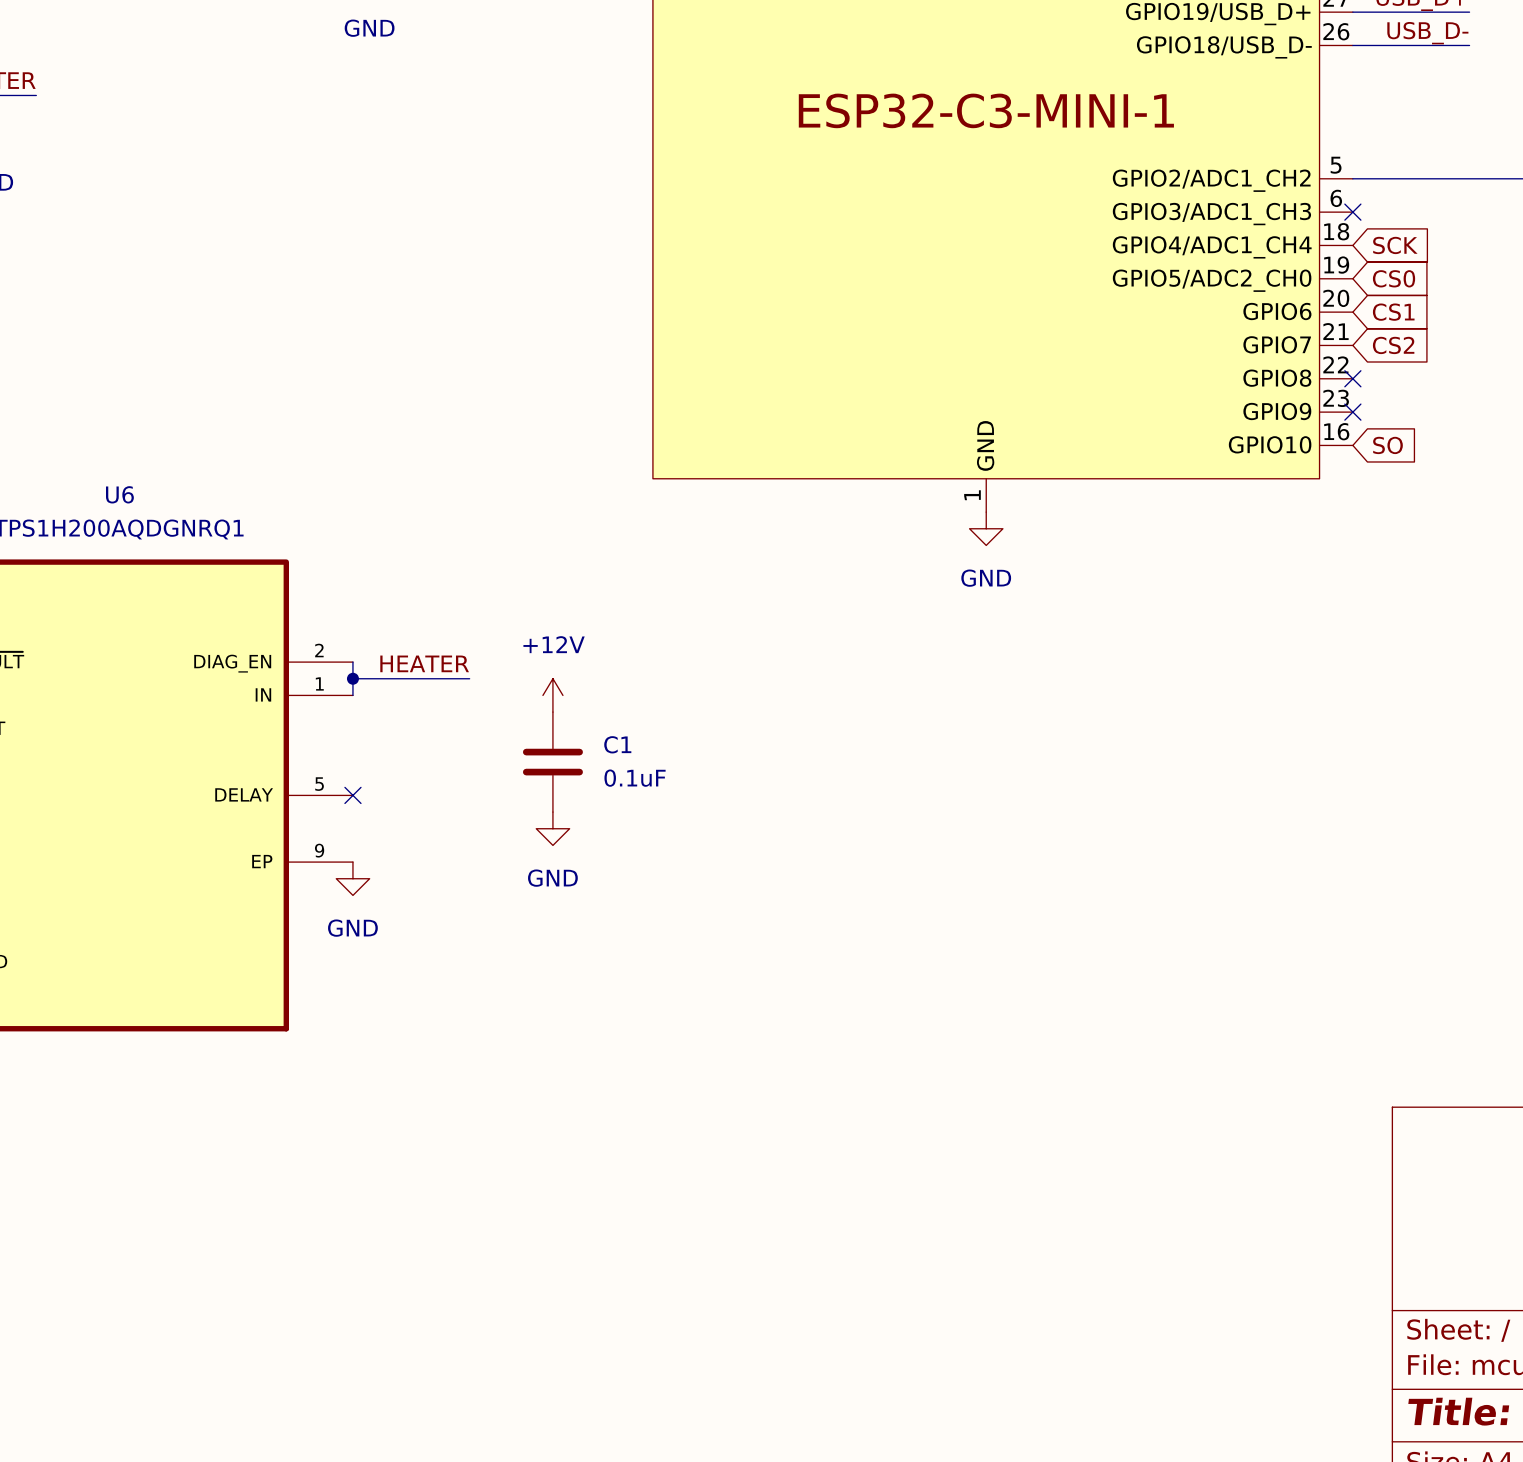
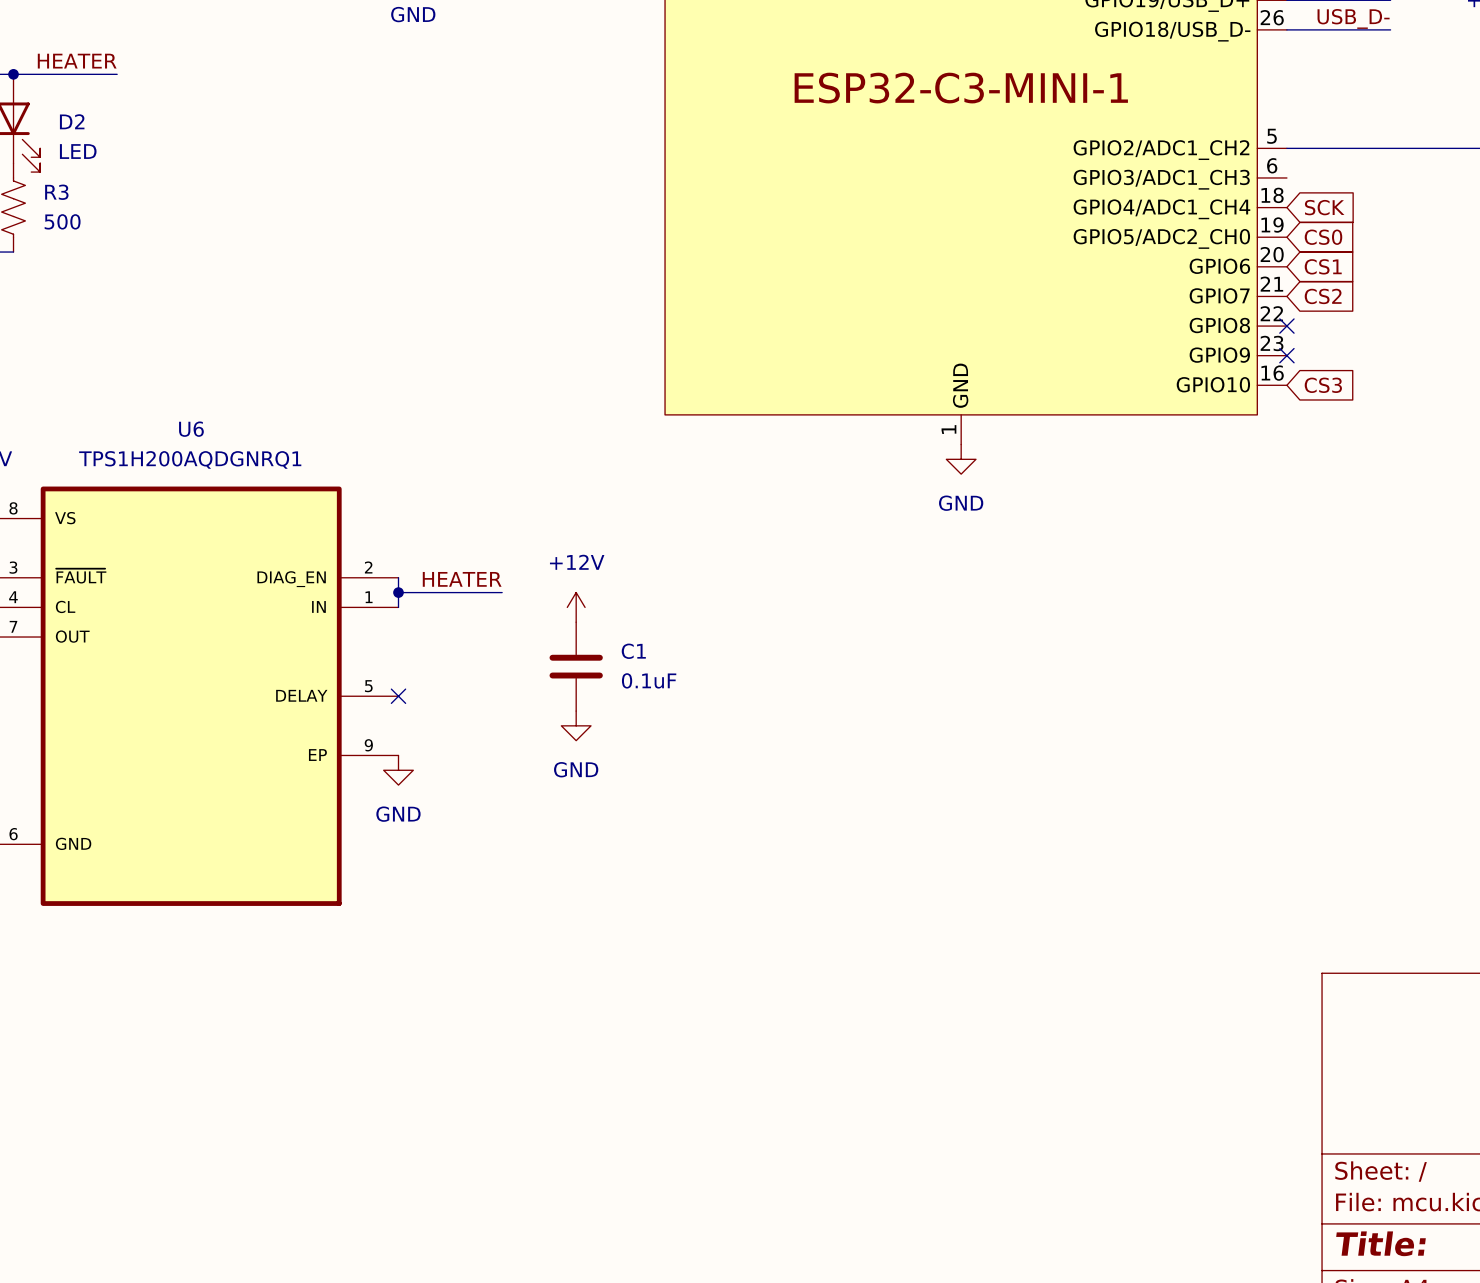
no-connect mark: (1352, 212) -> none
global label: SO (1387, 445) -> CS3 (1323, 385)

